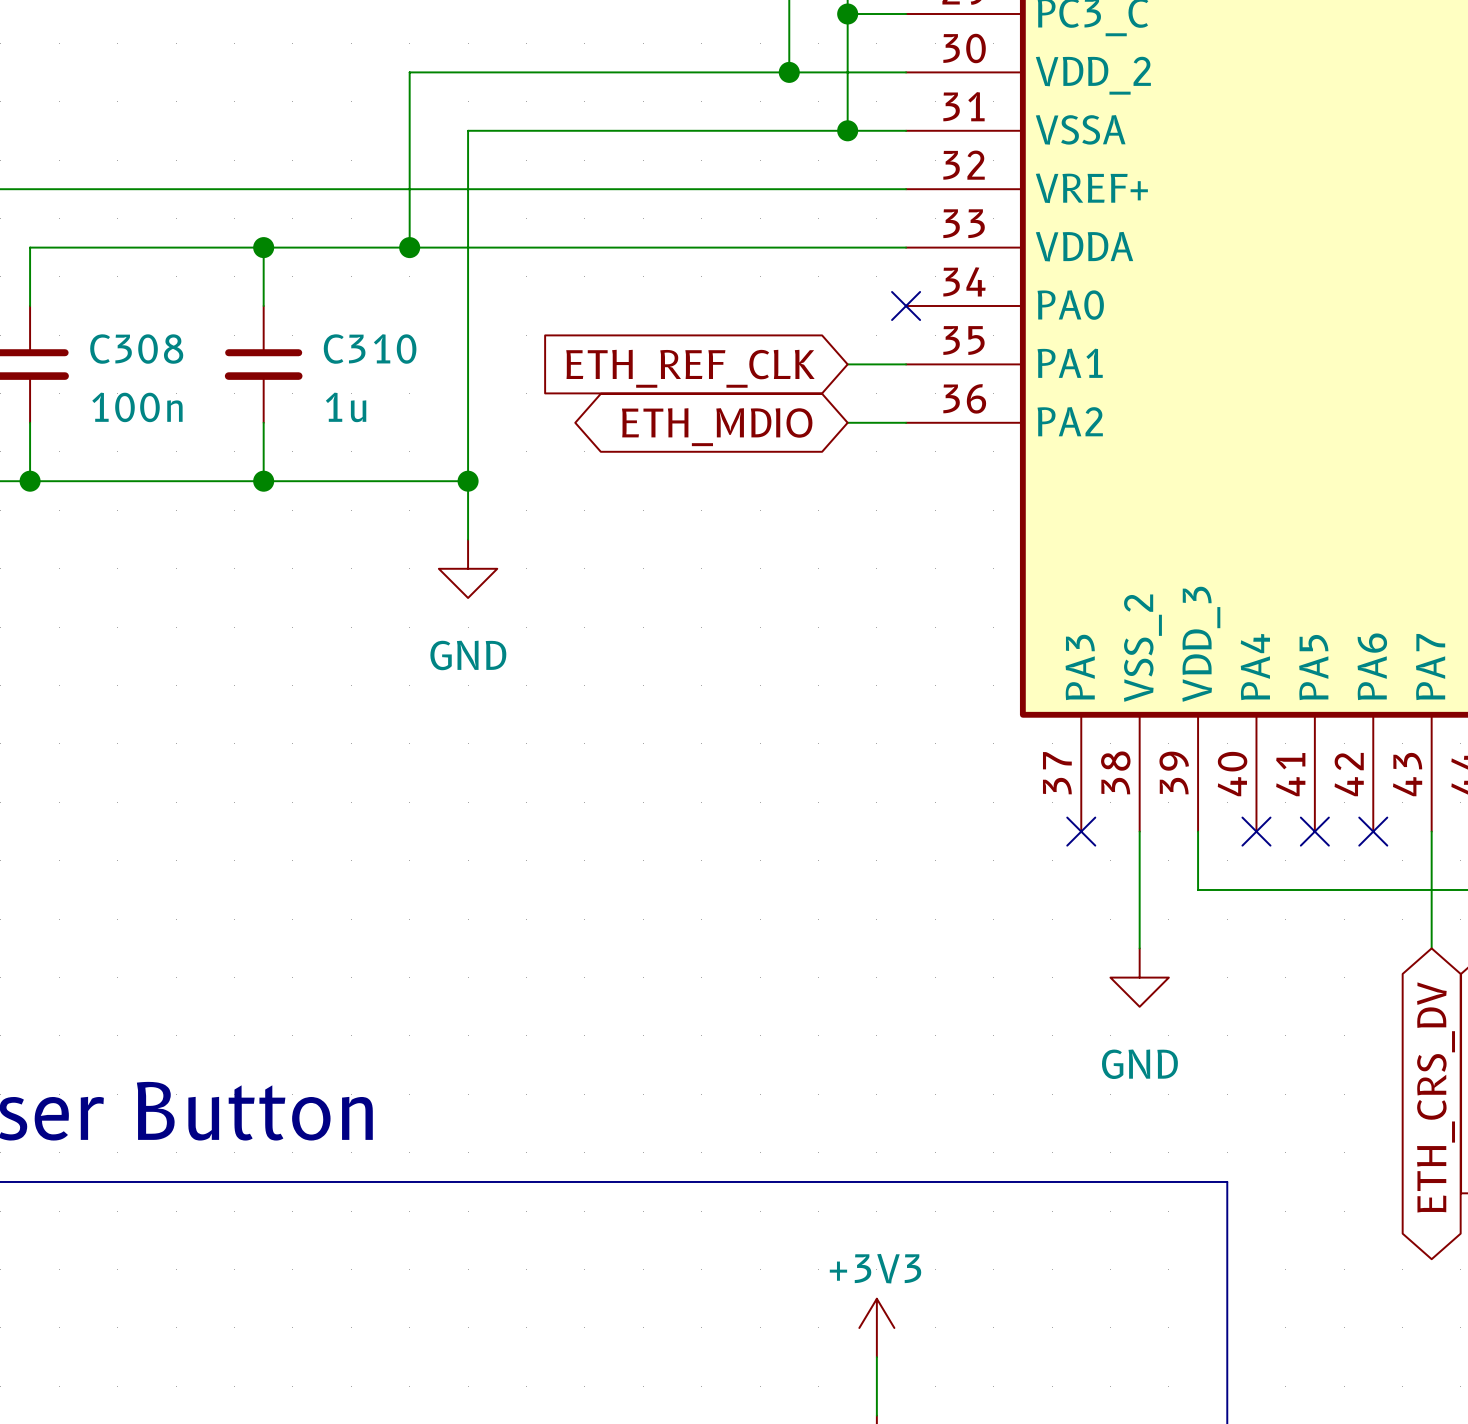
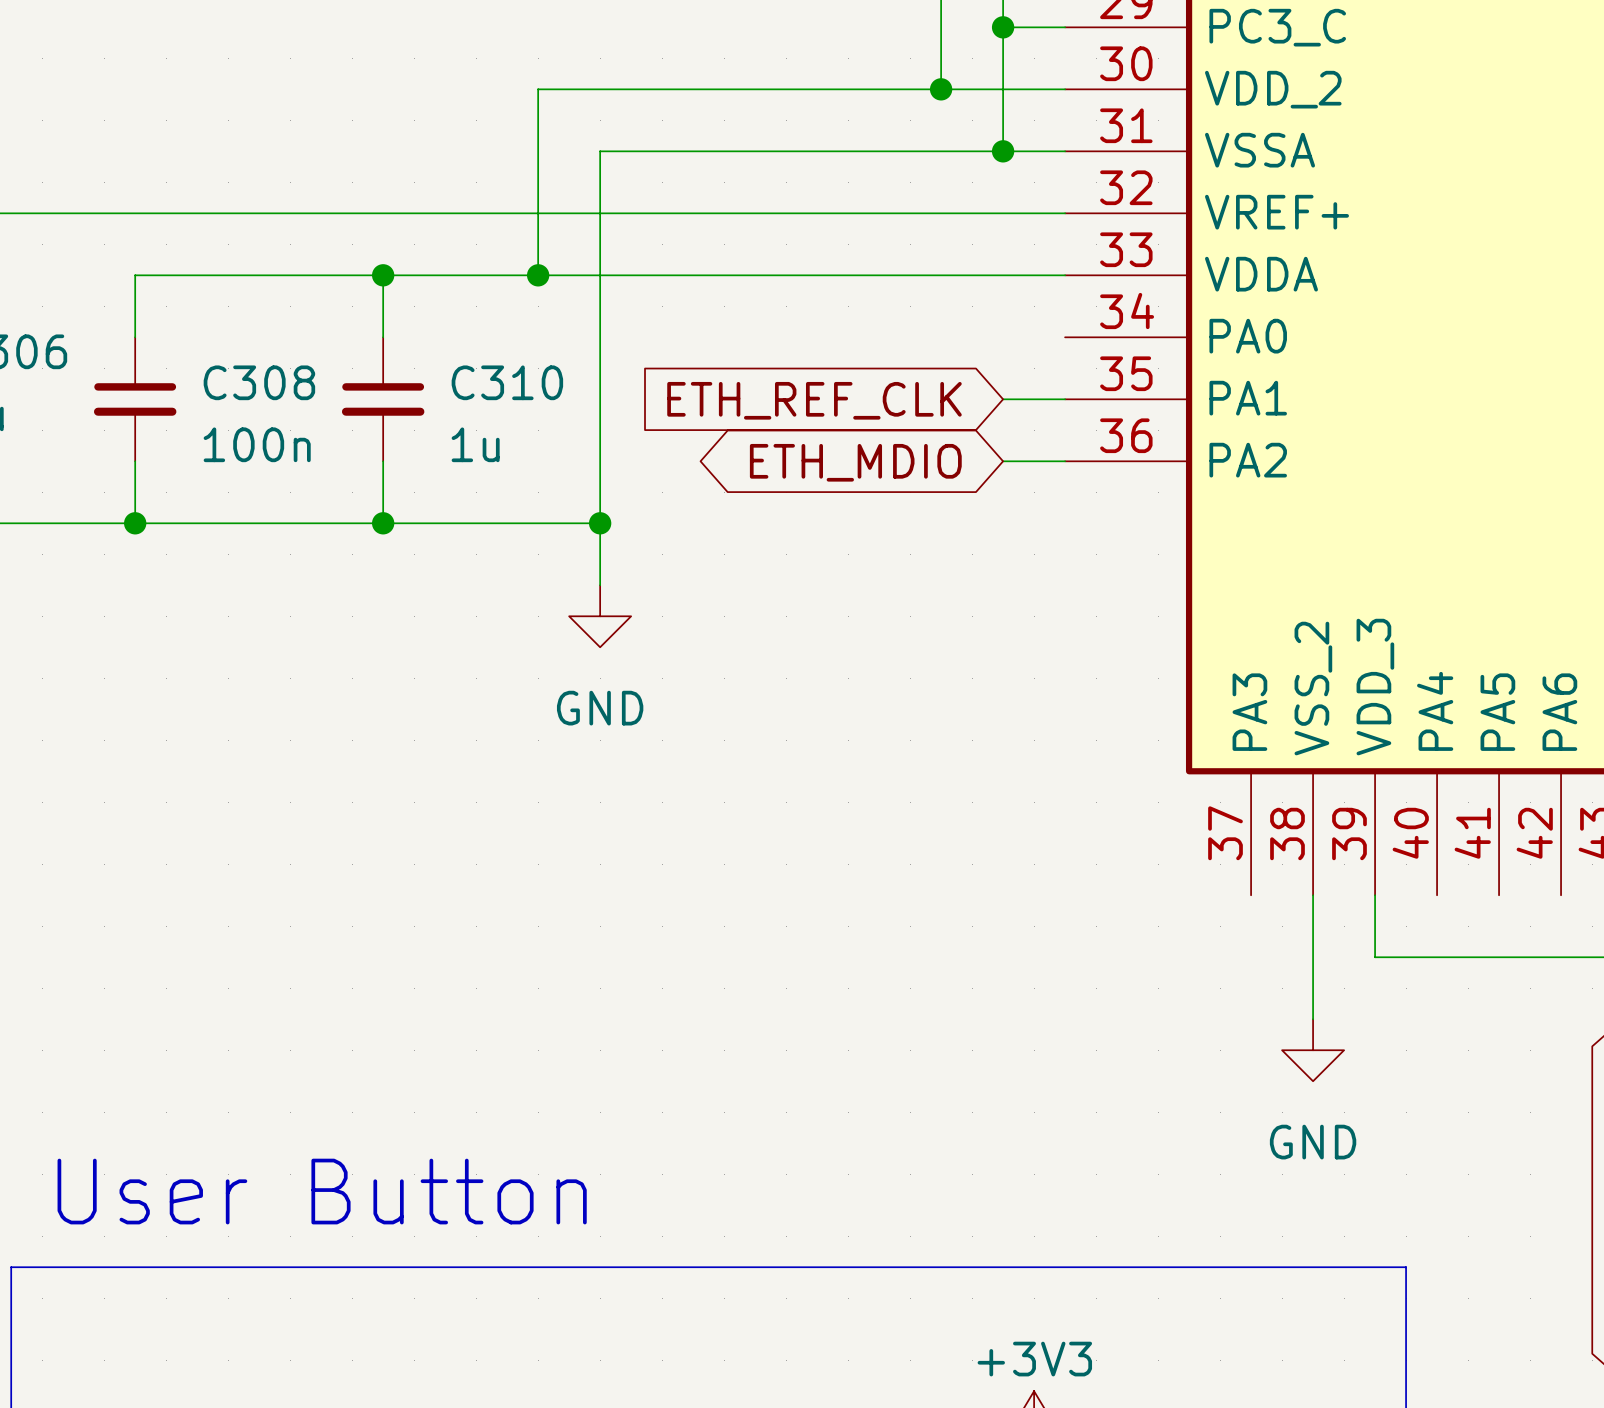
no-connect mark: (906, 305) -> none
no-connect mark: (1081, 831) -> none
no-connect mark: (1256, 831) -> none
no-connect mark: (1314, 831) -> none
no-connect mark: (1373, 831) -> none

